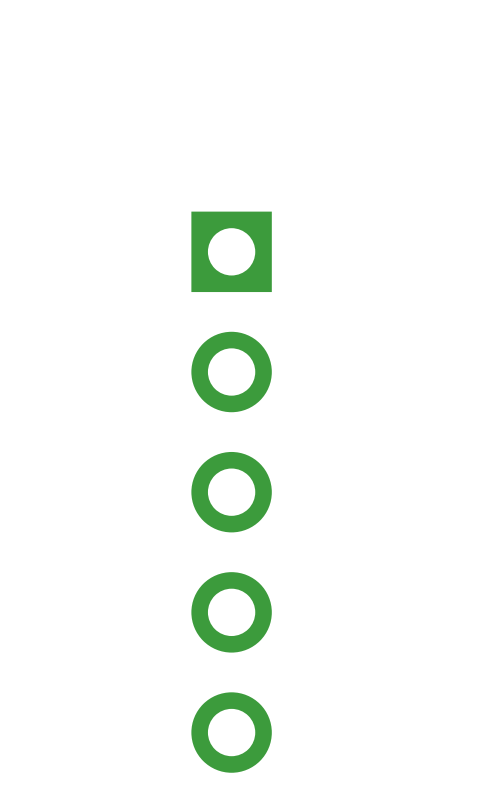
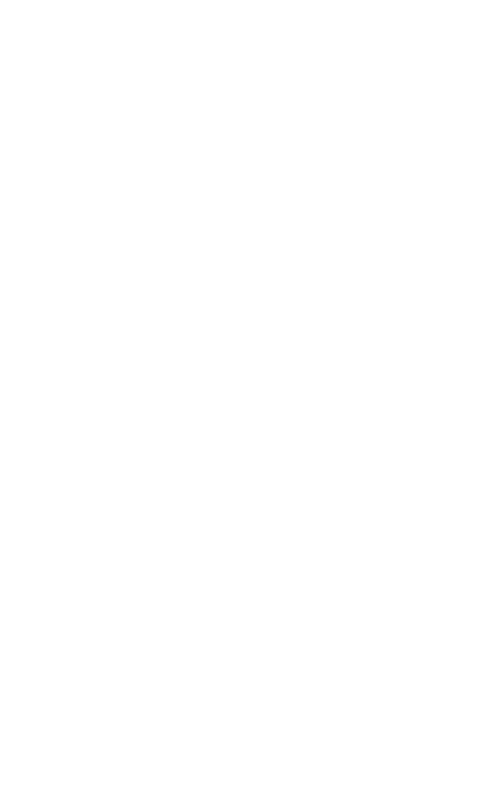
part: (231, 492) -> none

